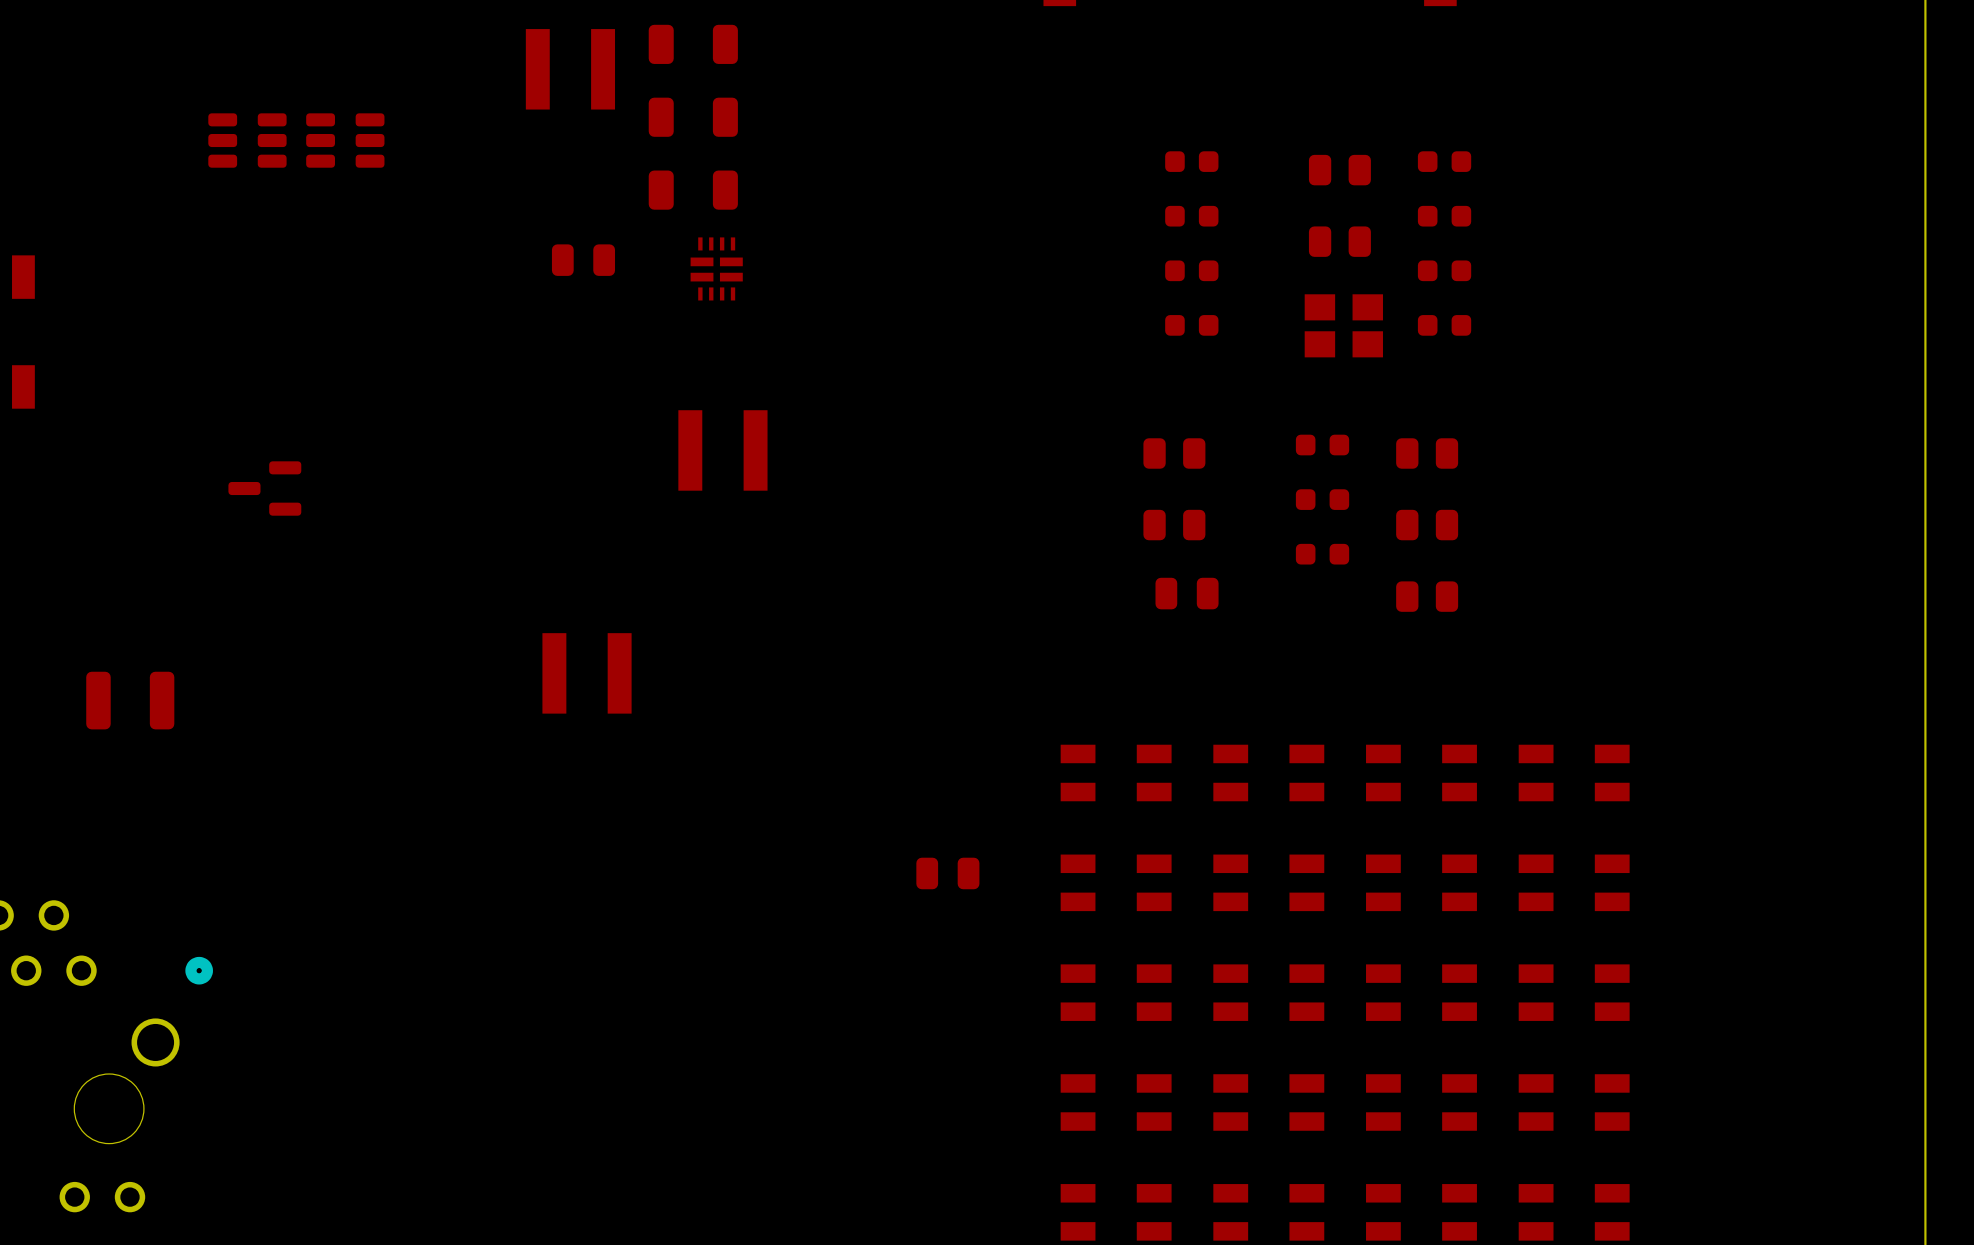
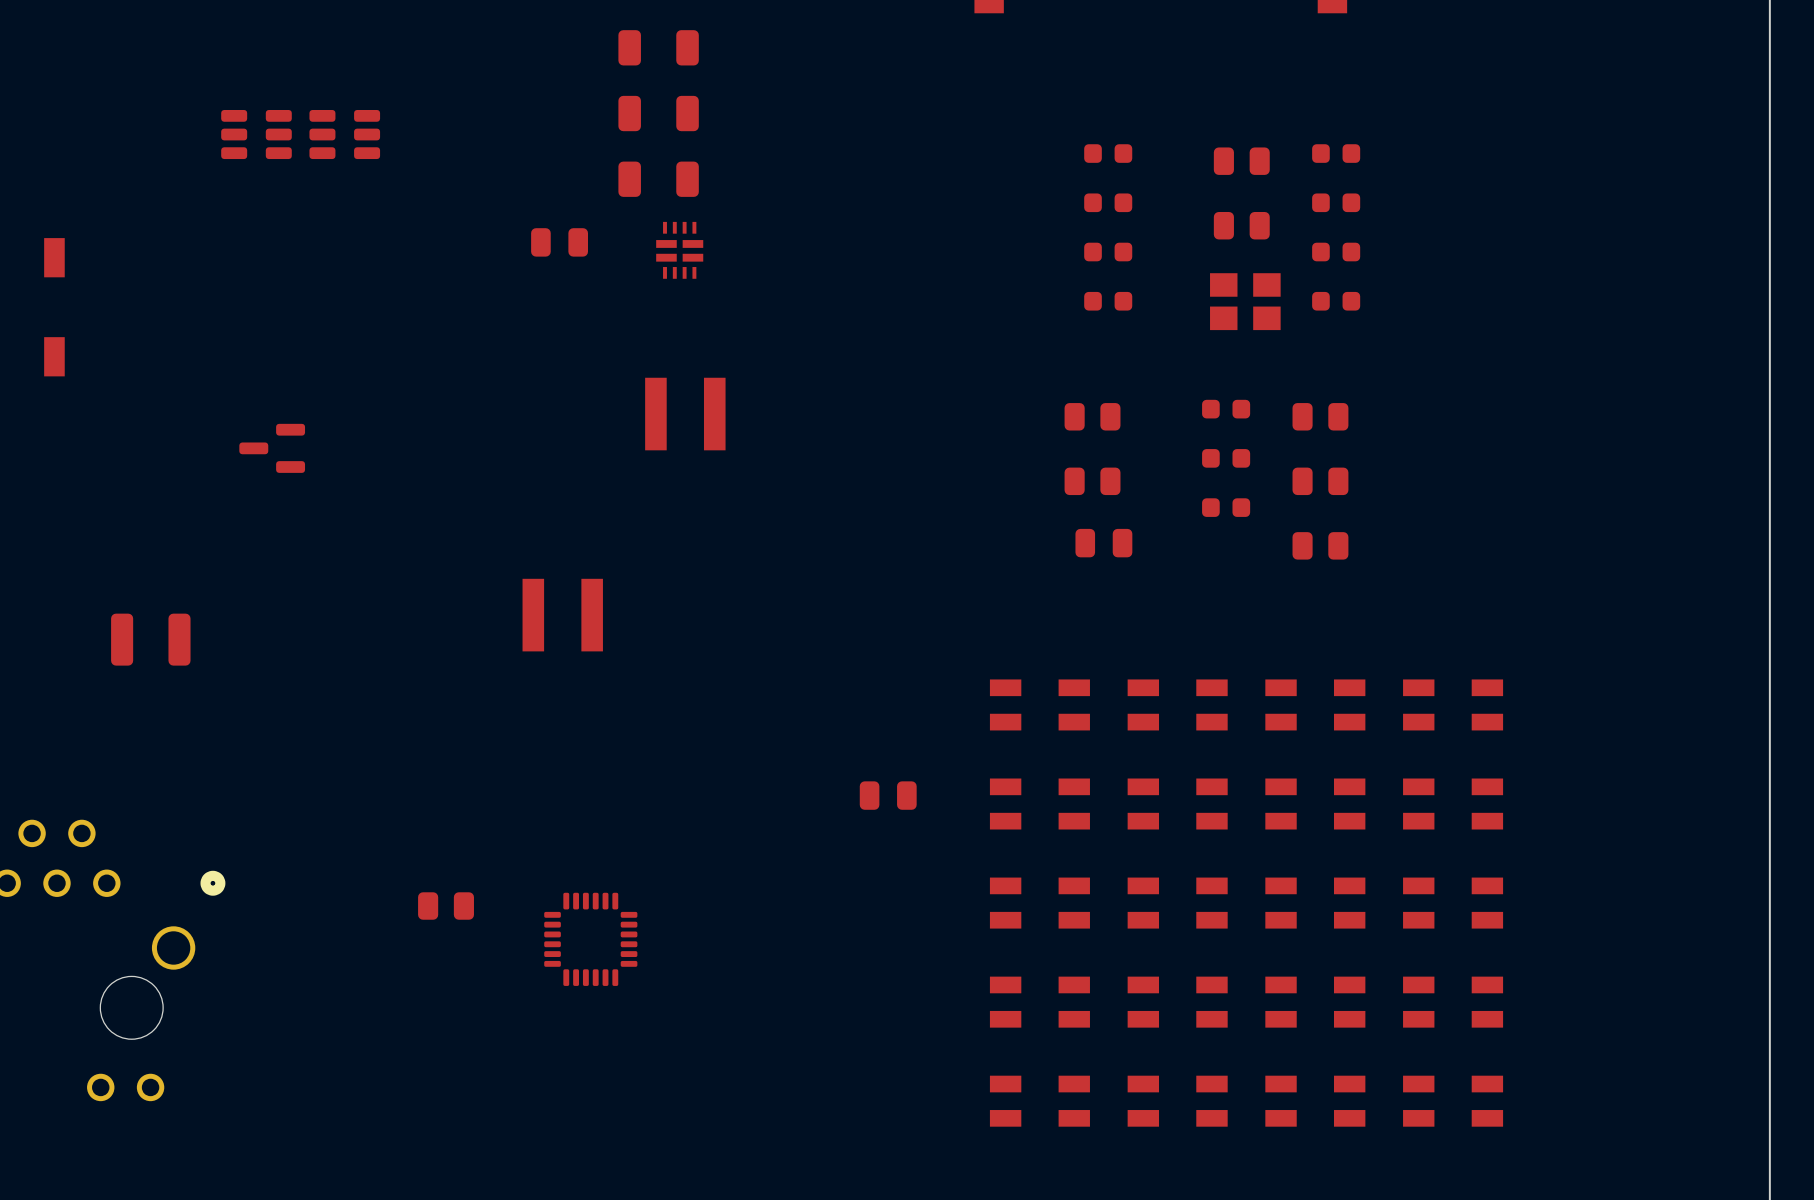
part: (570, 69) -> none
part: none -> (446, 906)
part: none -> (590, 939)

